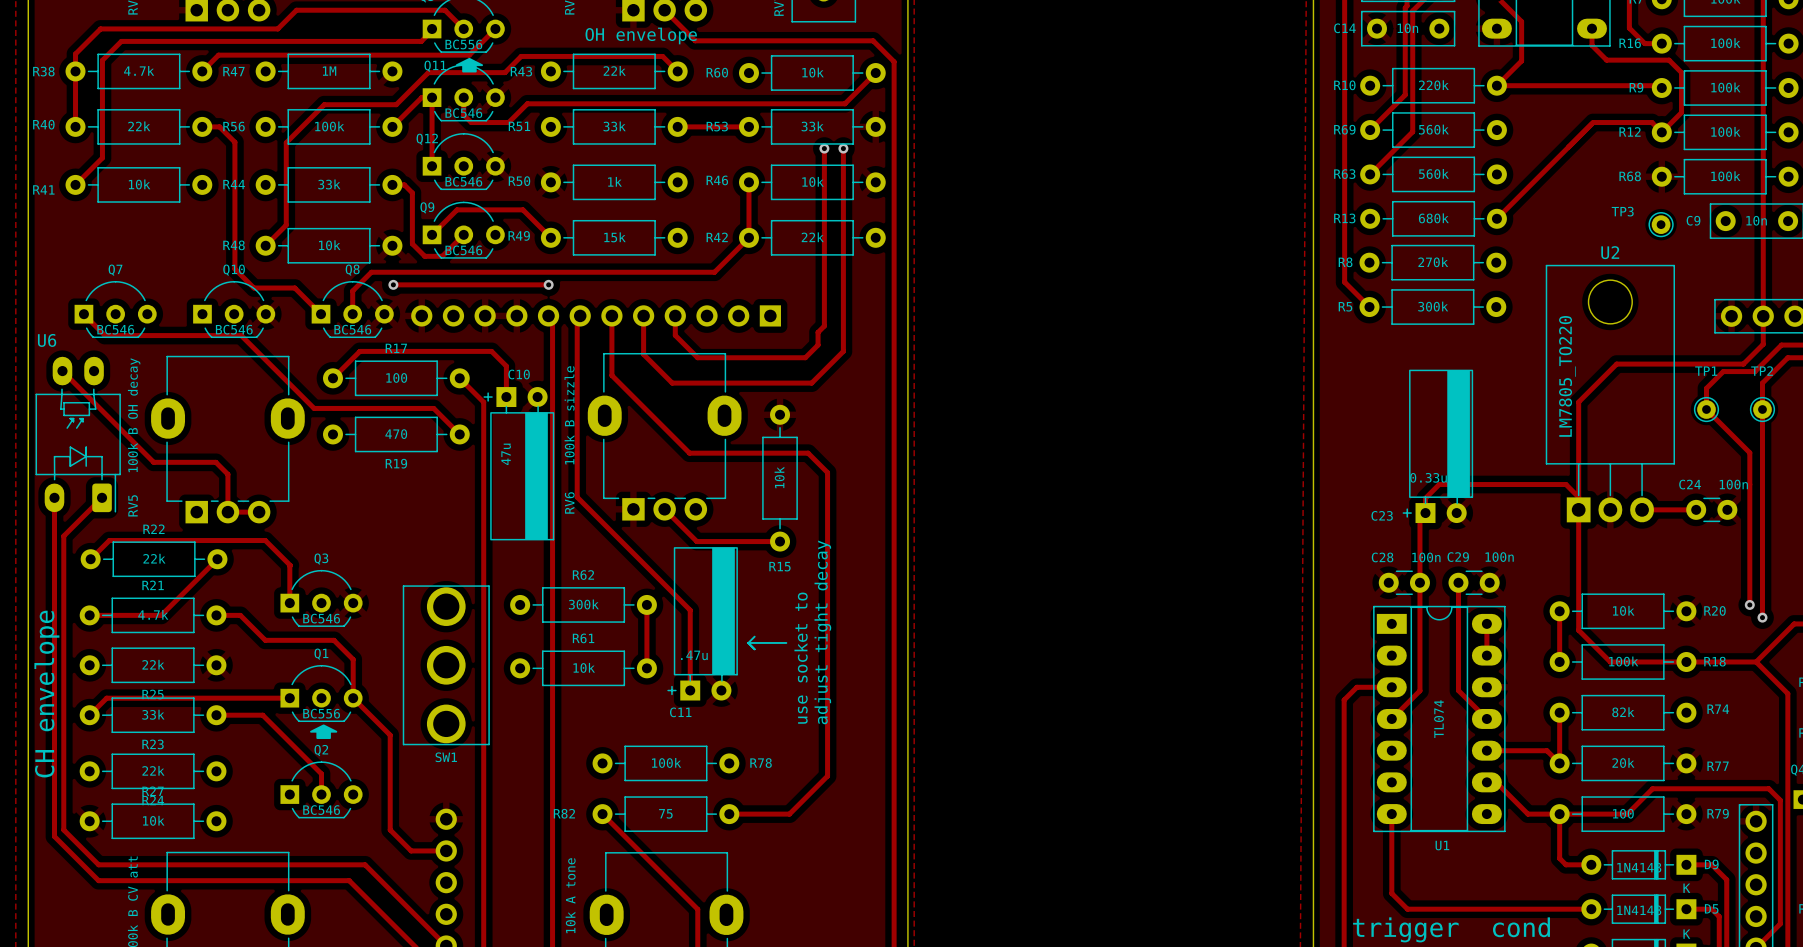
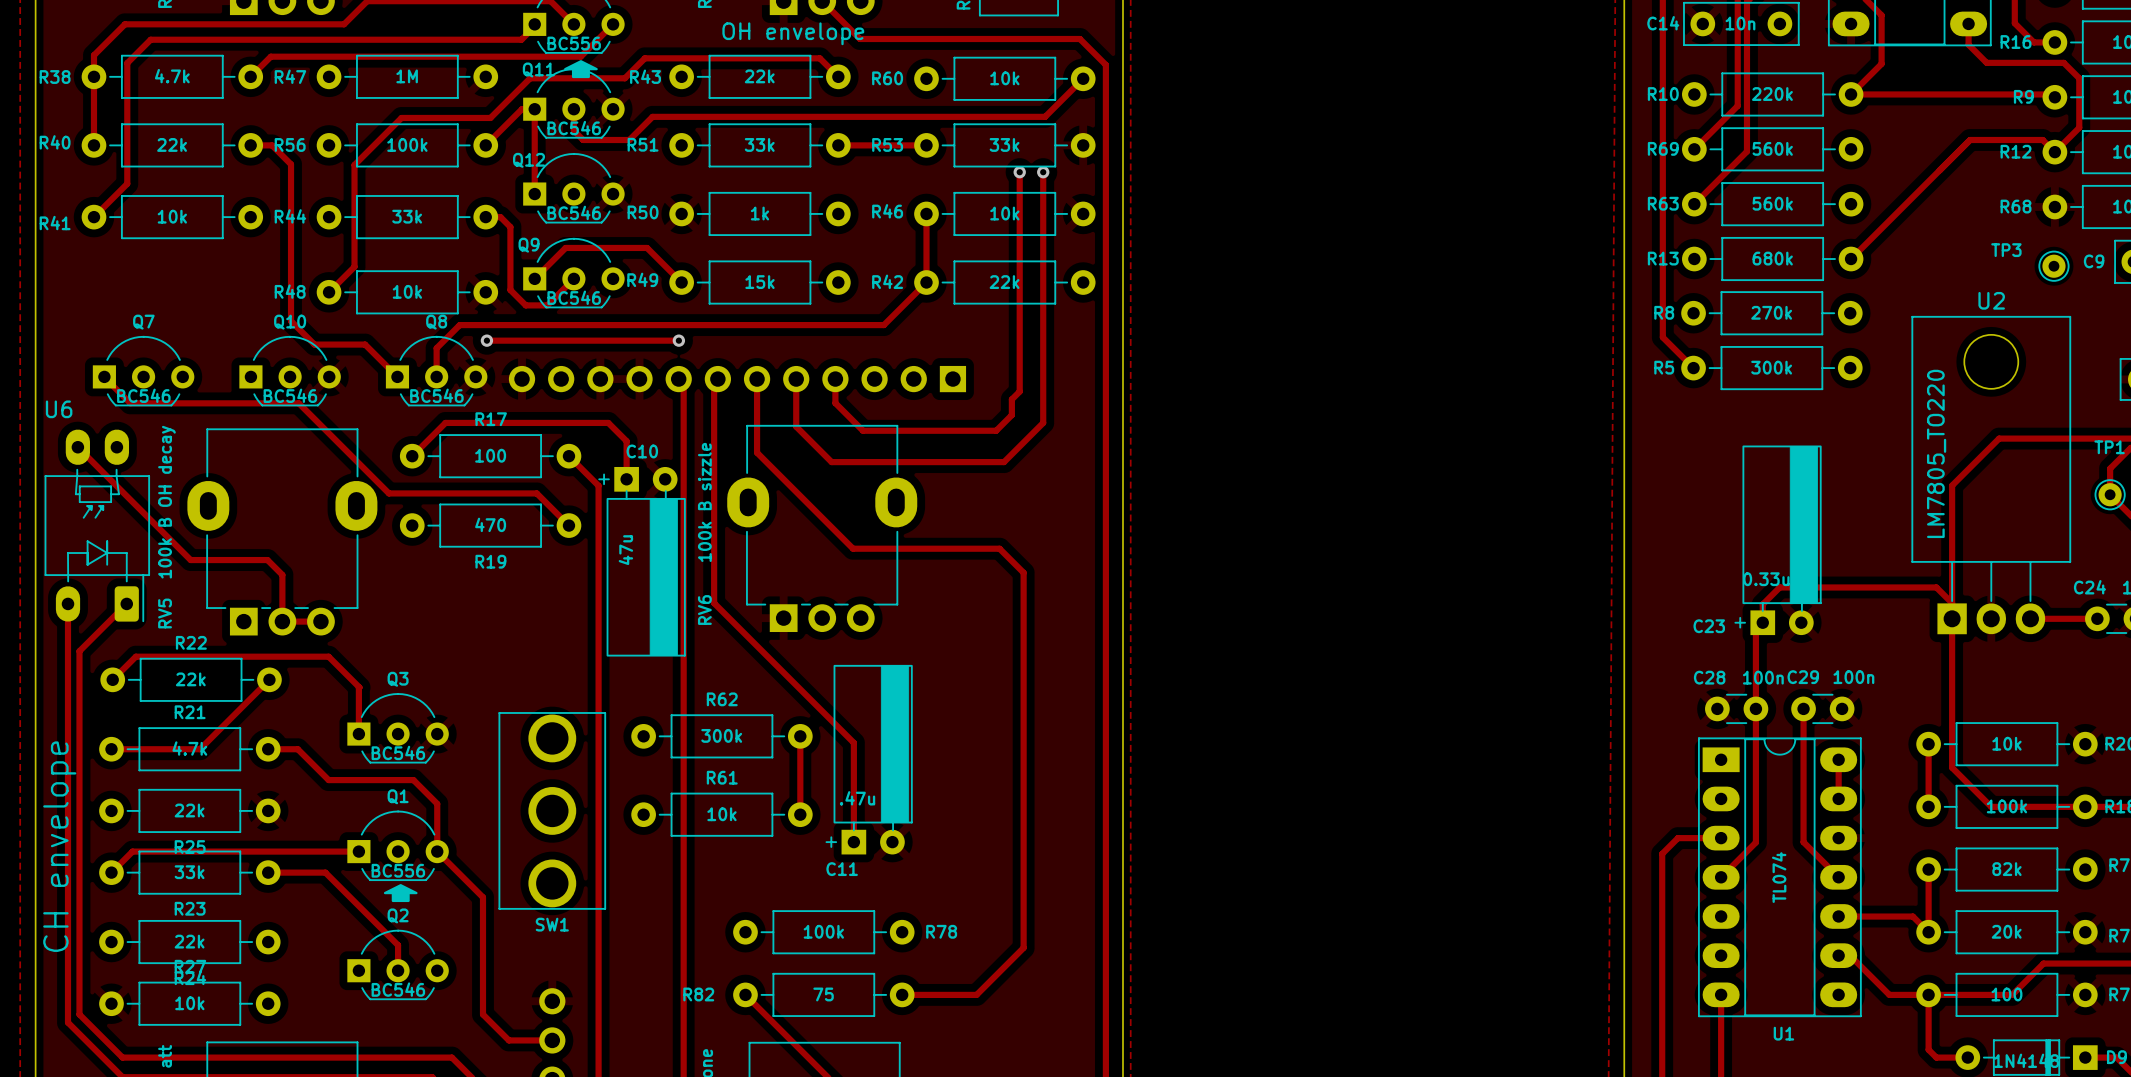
R15: 10k (780, 478) -> none
track: (664, 509) (696, 541) (780, 541) -> none
text: adjust tight decay (822, 632) -> none
line: (754, 636) (748, 642) -> none
line: (748, 642) (786, 642) -> none
text: use socket to (801, 658) -> none

